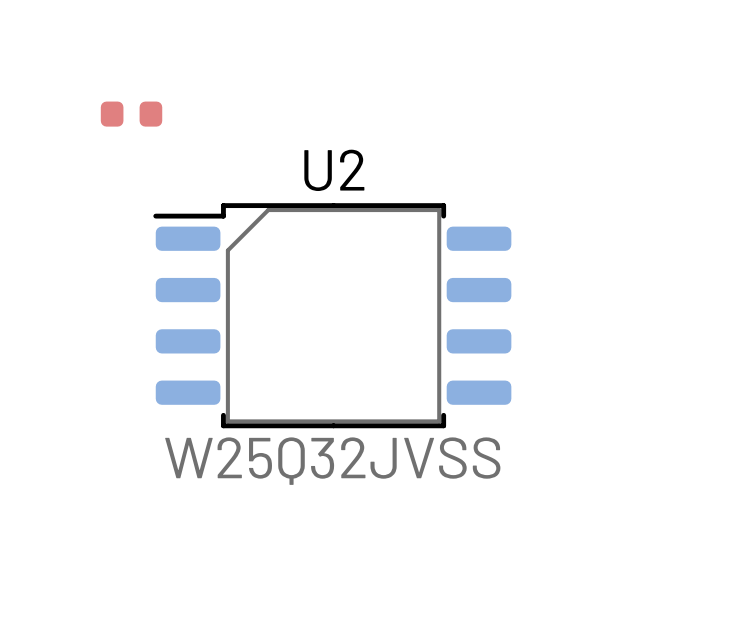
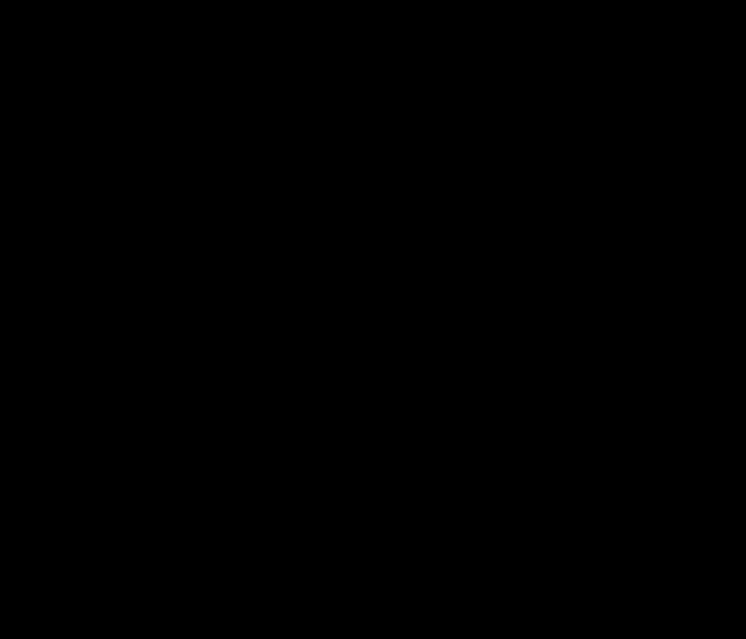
part: (131, 114) -> none
U2: W25Q32JVSS (332, 315) -> none

